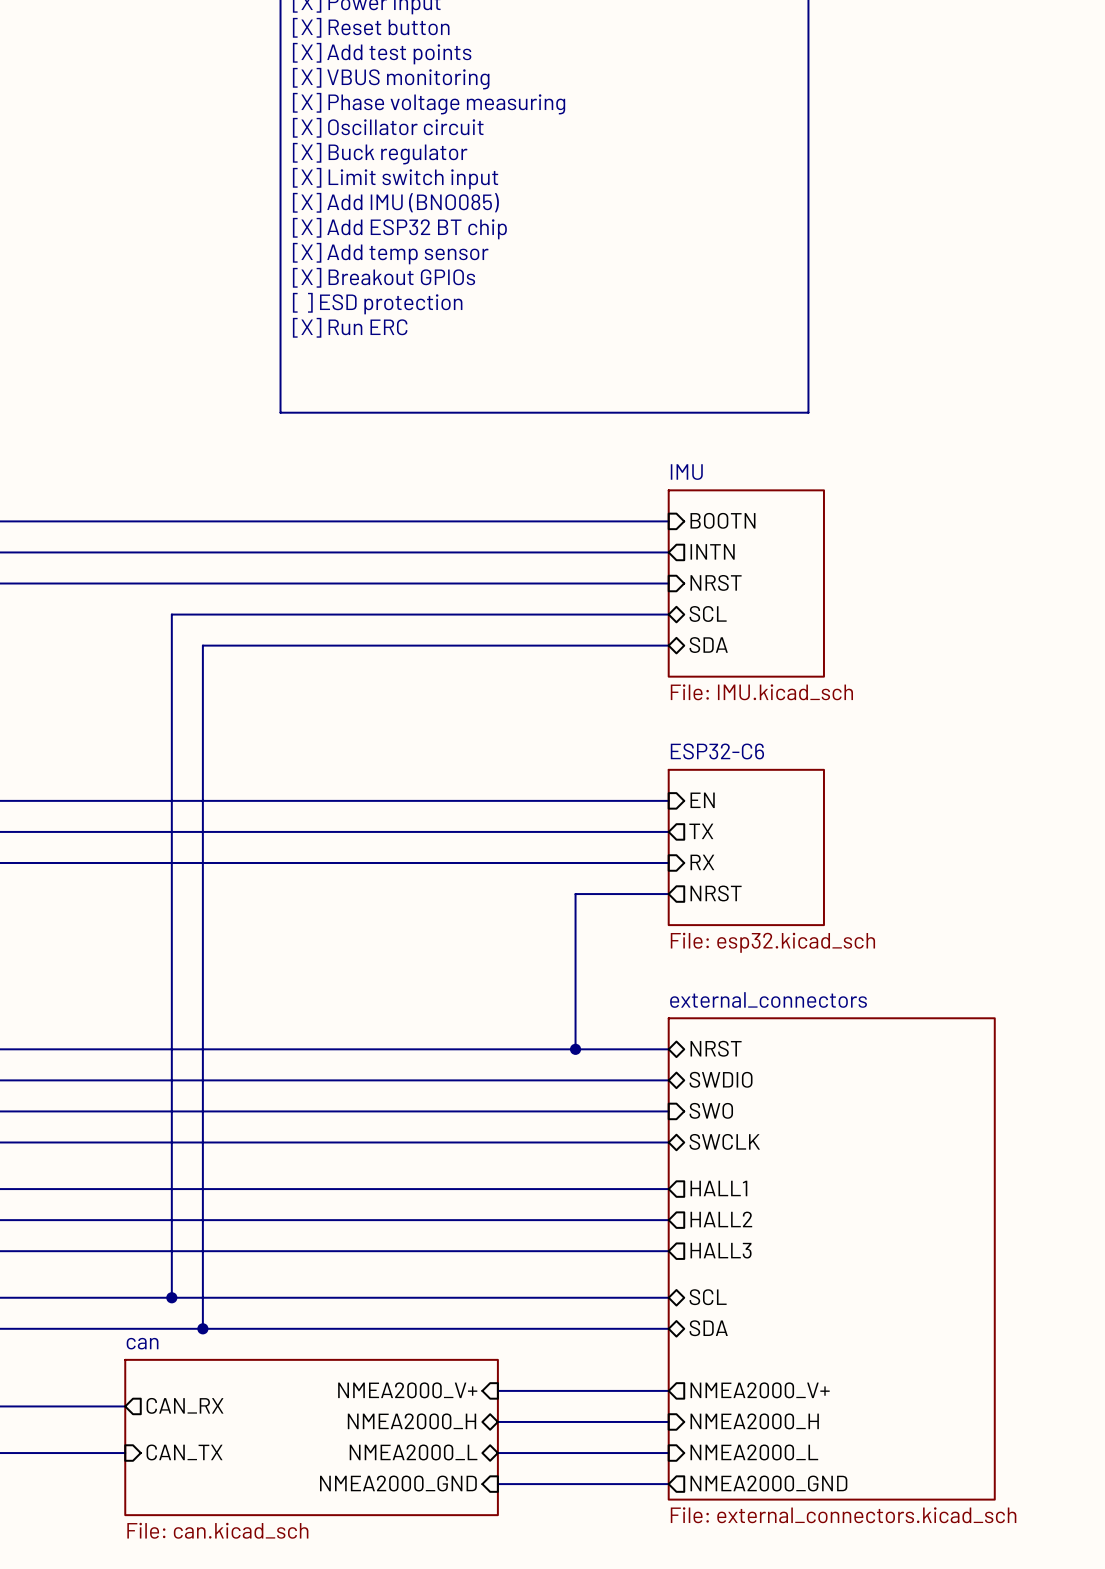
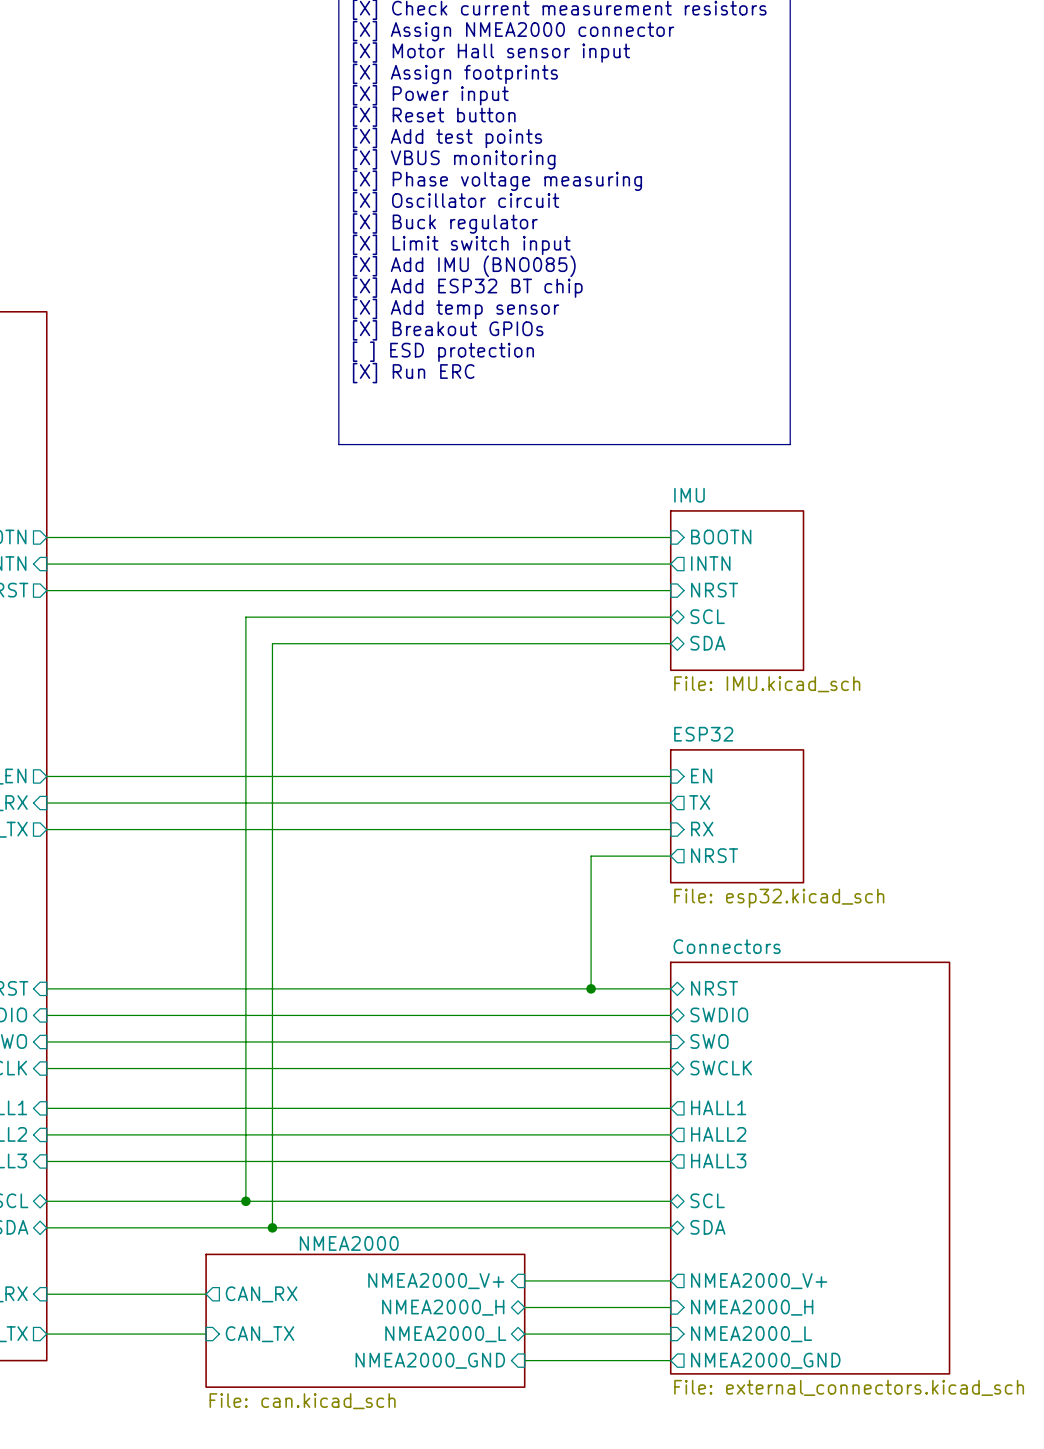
sheet ESP32-C6 name: ESP32-C6 (717, 751) -> ESP32 (703, 734)
sheet external_connectors name: external_connectors (768, 1000) -> Connectors (727, 946)
sheet can name: can (142, 1343) -> NMEA2000 (349, 1243)

